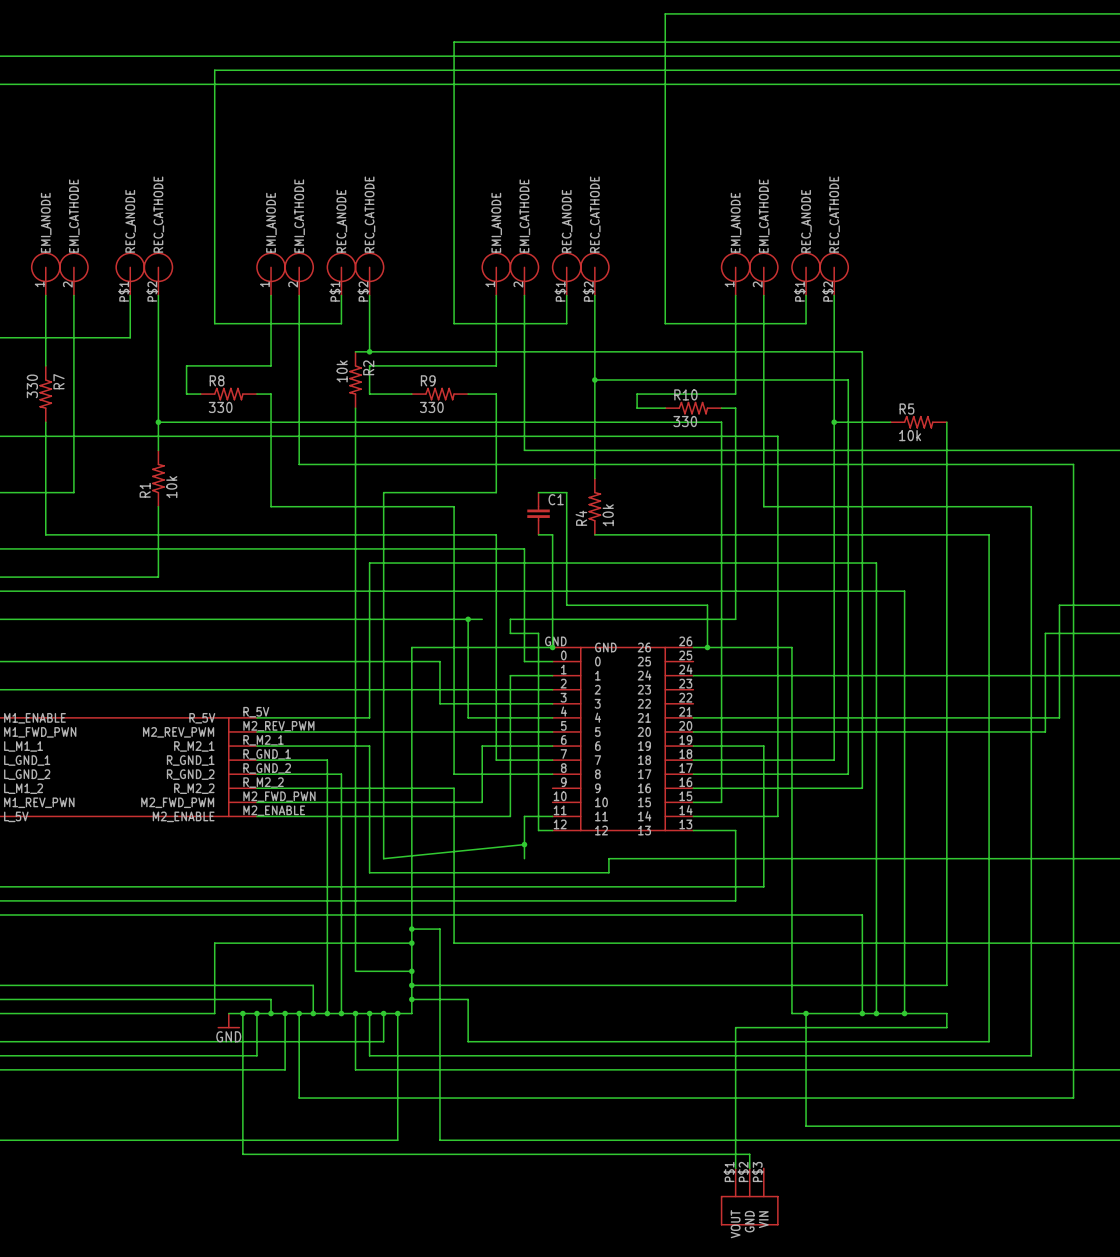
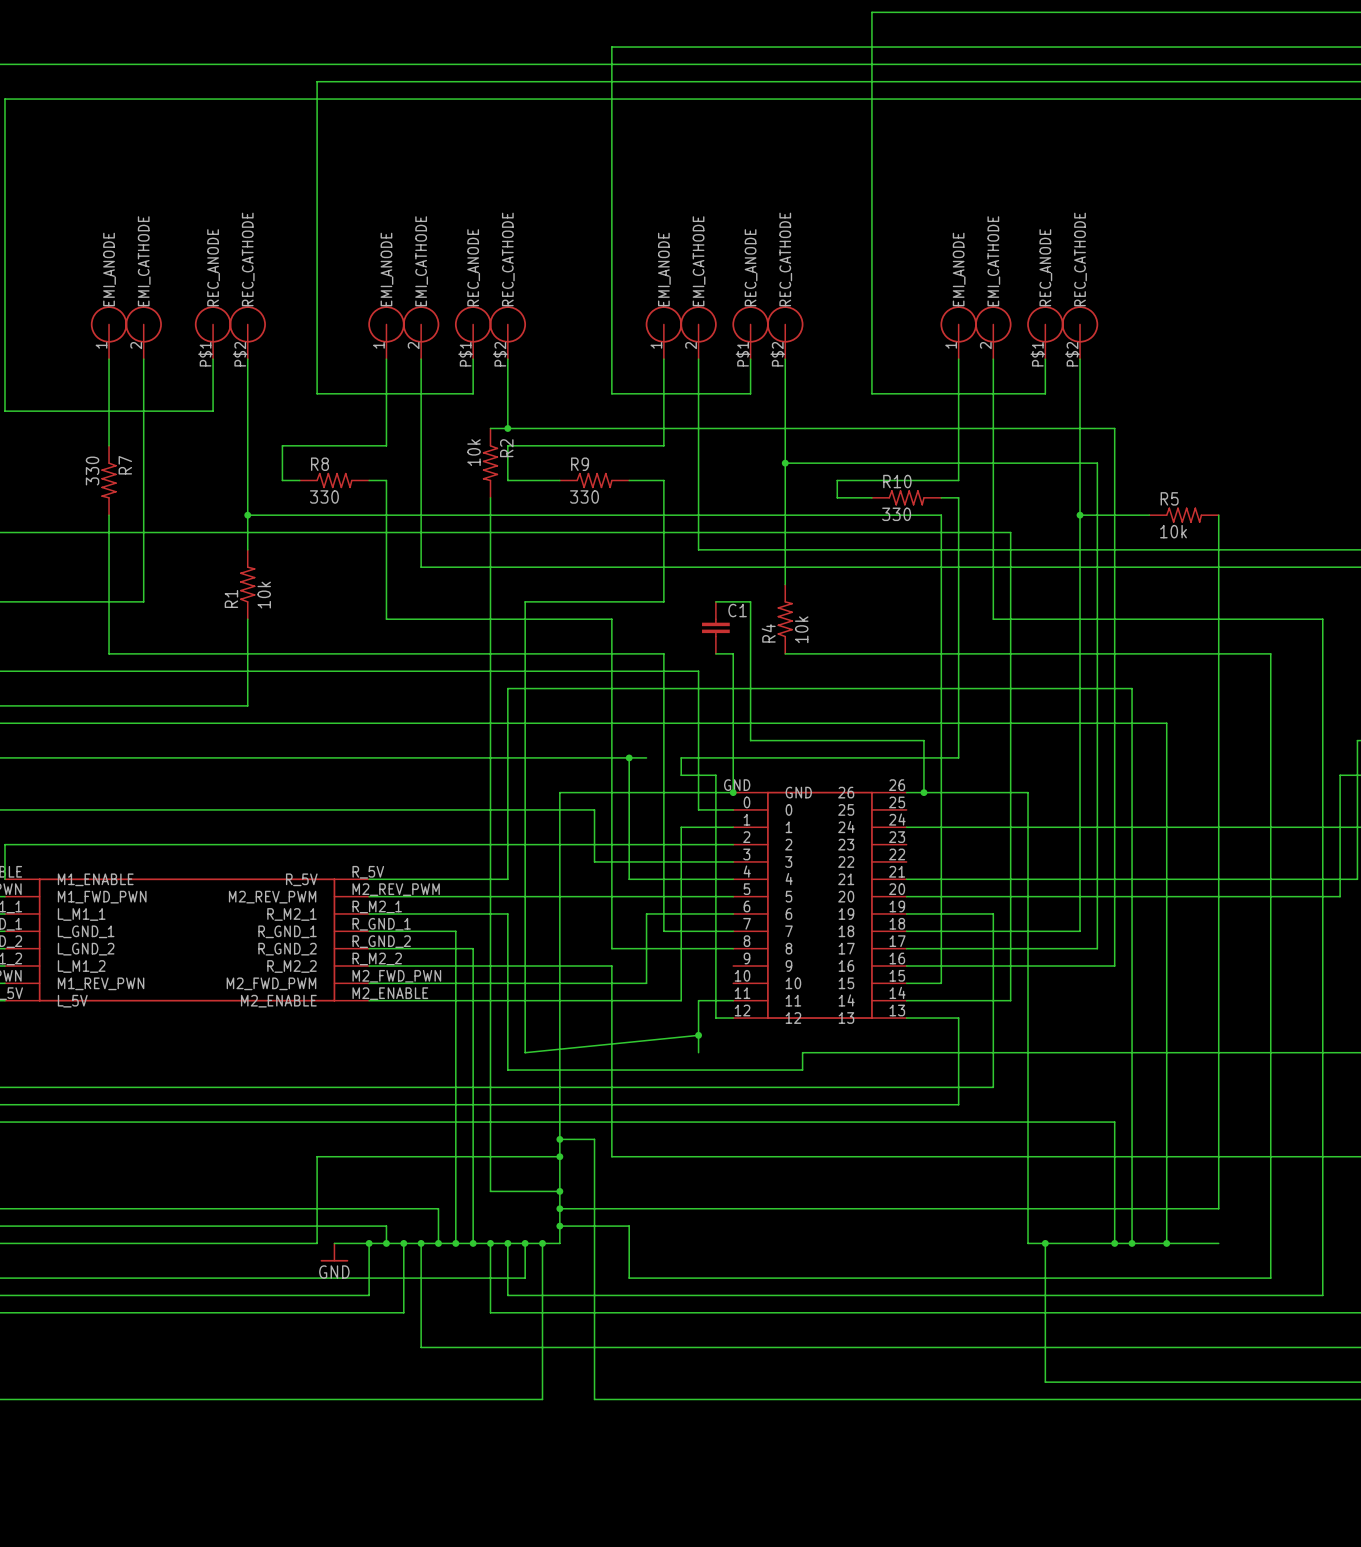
wire: (242, 1013) (242, 1154) (749, 1154) (749, 1168) -> none
junction: (242, 1013) -> none
wire: (946, 1013) (946, 1027) (735, 1027) (735, 1168) -> none
part: (749, 1196) -> none

